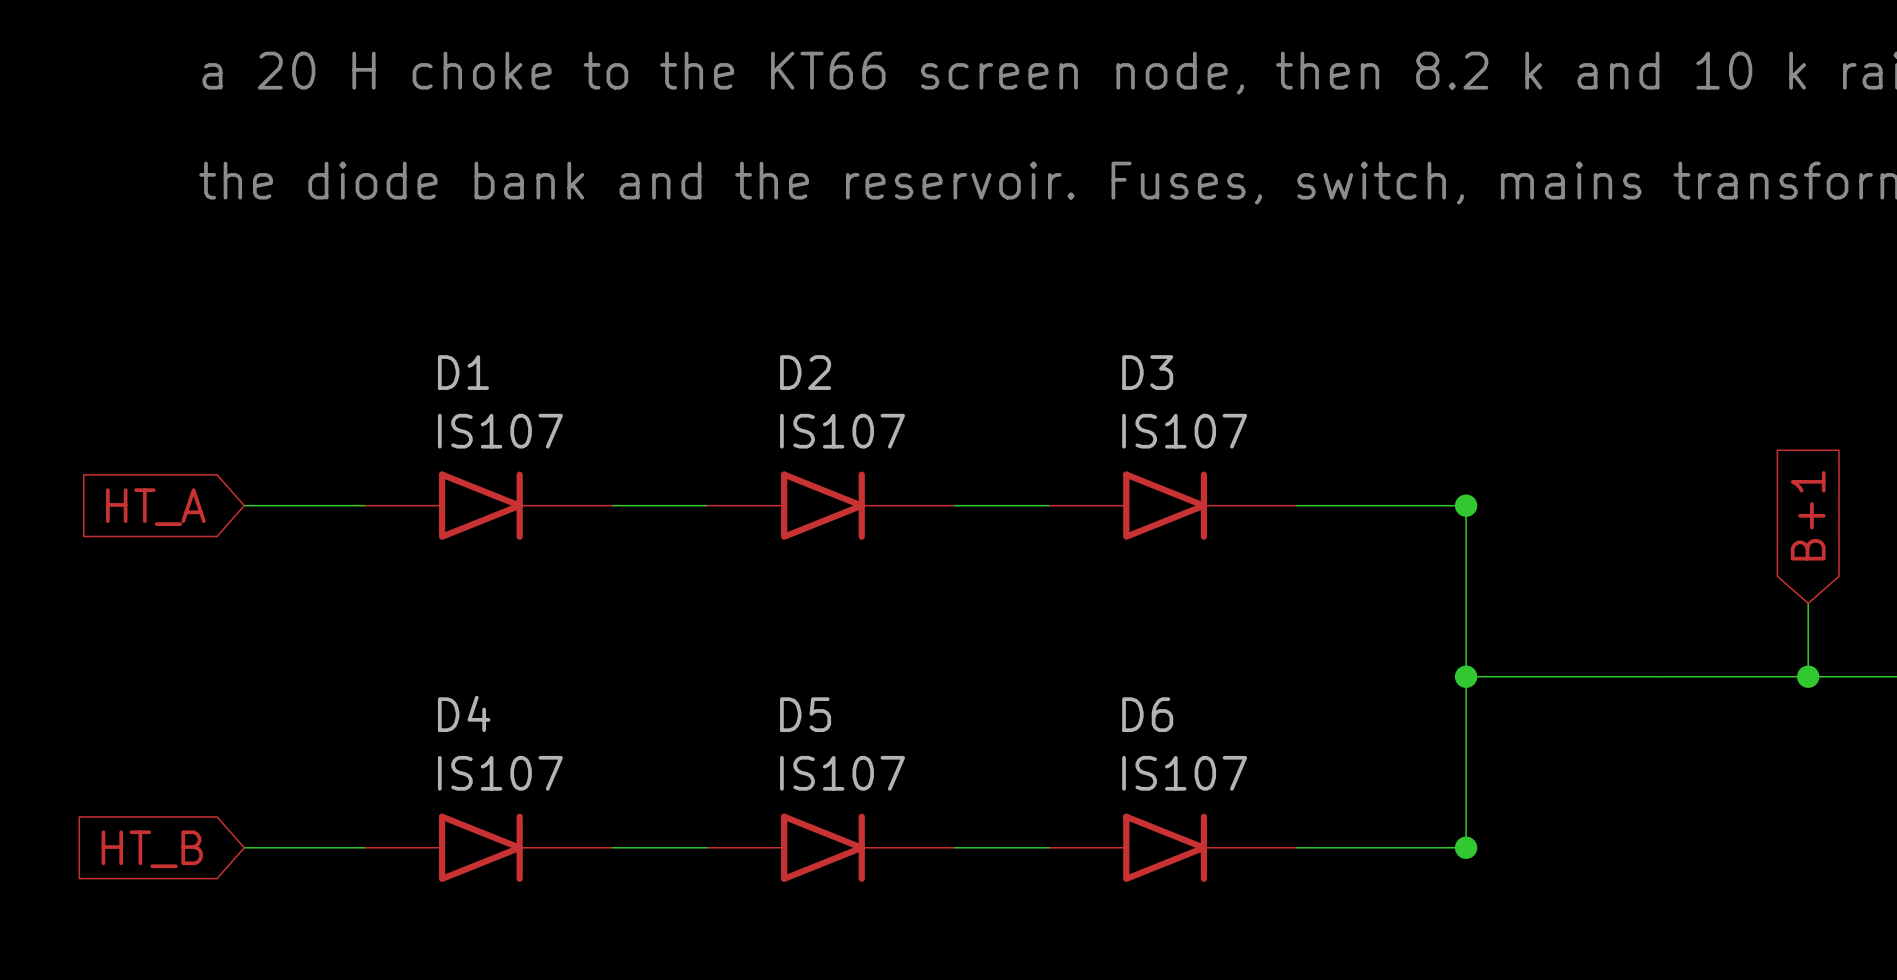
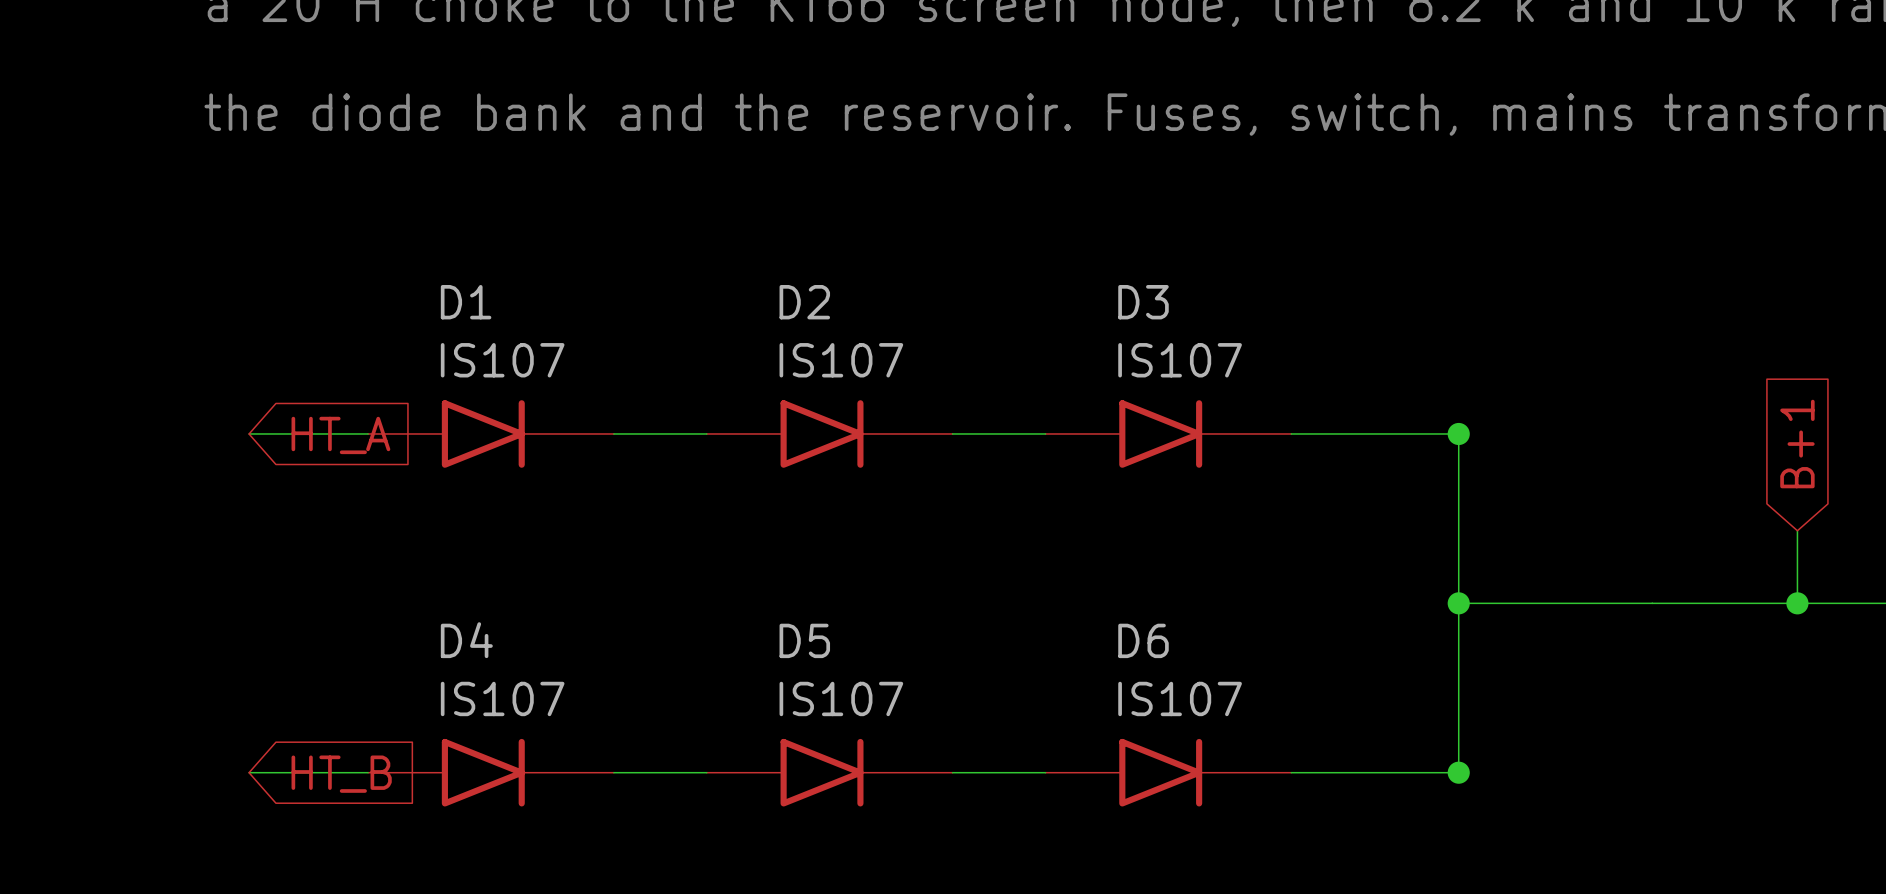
global label rotation: 0° (155, 507) -> 180° (340, 435)
global label rotation: 0° (152, 849) -> 180° (341, 774)

